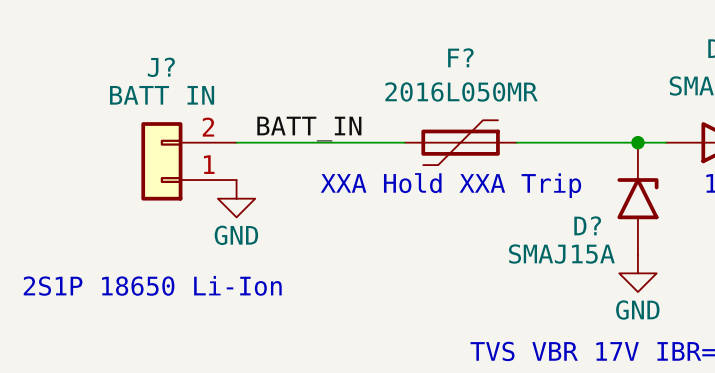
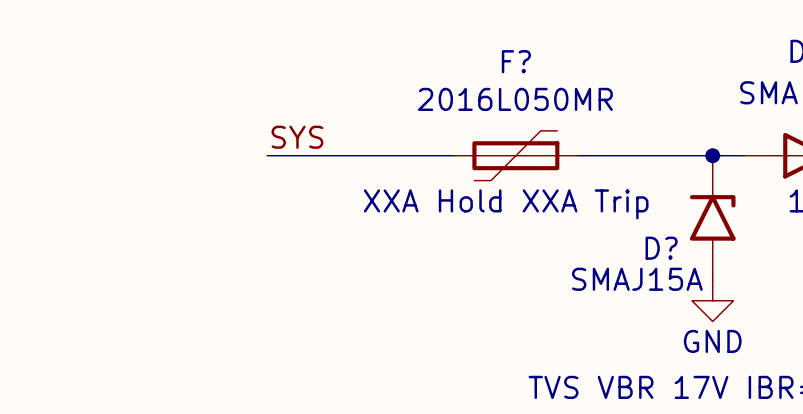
label: none -> SYS (297, 137)
label: BATT_IN (309, 129) -> none
J?: BATT IN (188, 161) -> none
power symbol: GND (236, 198) -> none
text: 2S1P 18650 Li-Ion (152, 285) -> none

